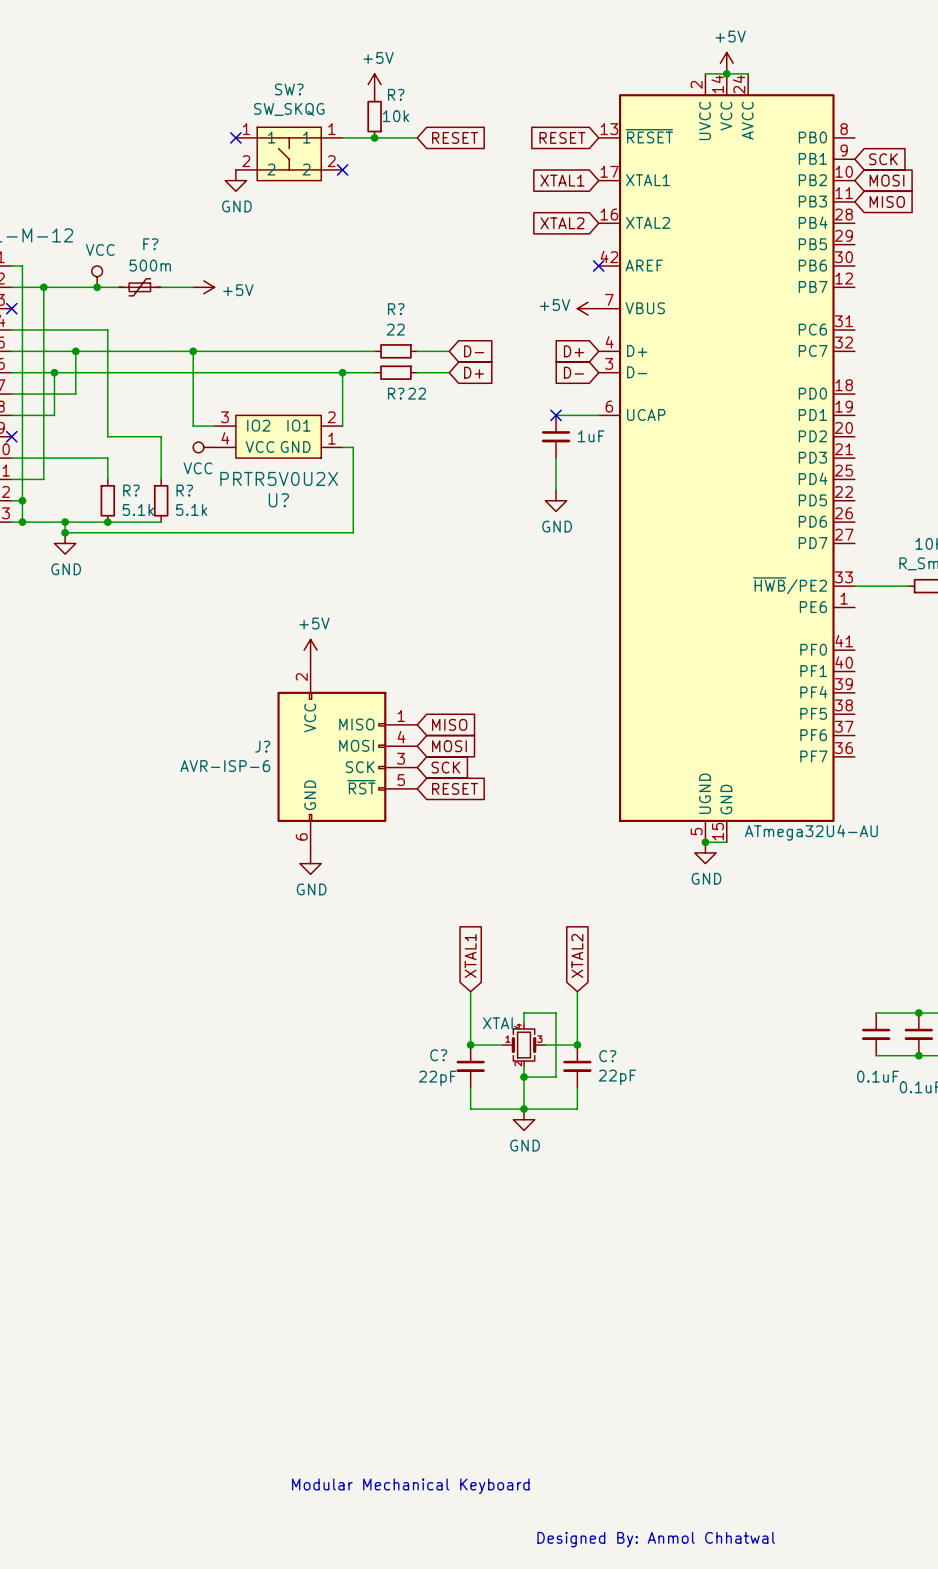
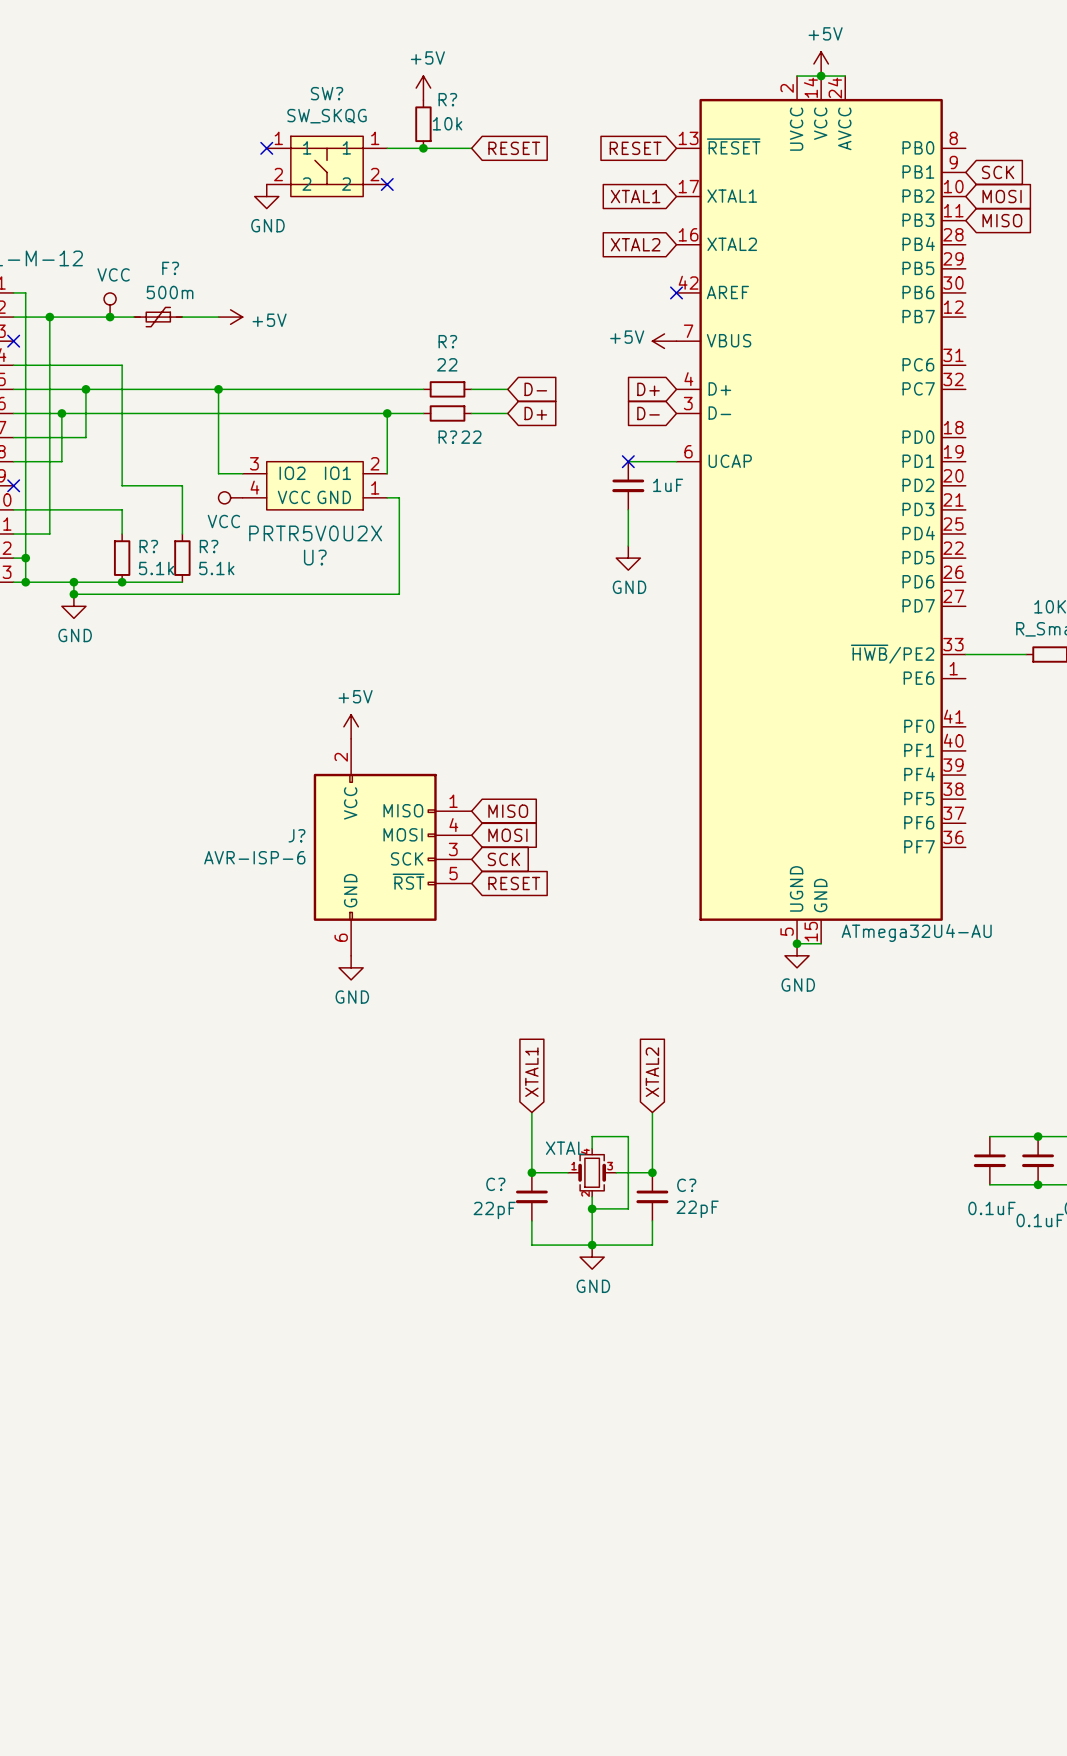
text: Modular Mechanical Keyboard (410, 1486) -> none
text: Designed By: Anmol Chhatwal (656, 1539) -> none

